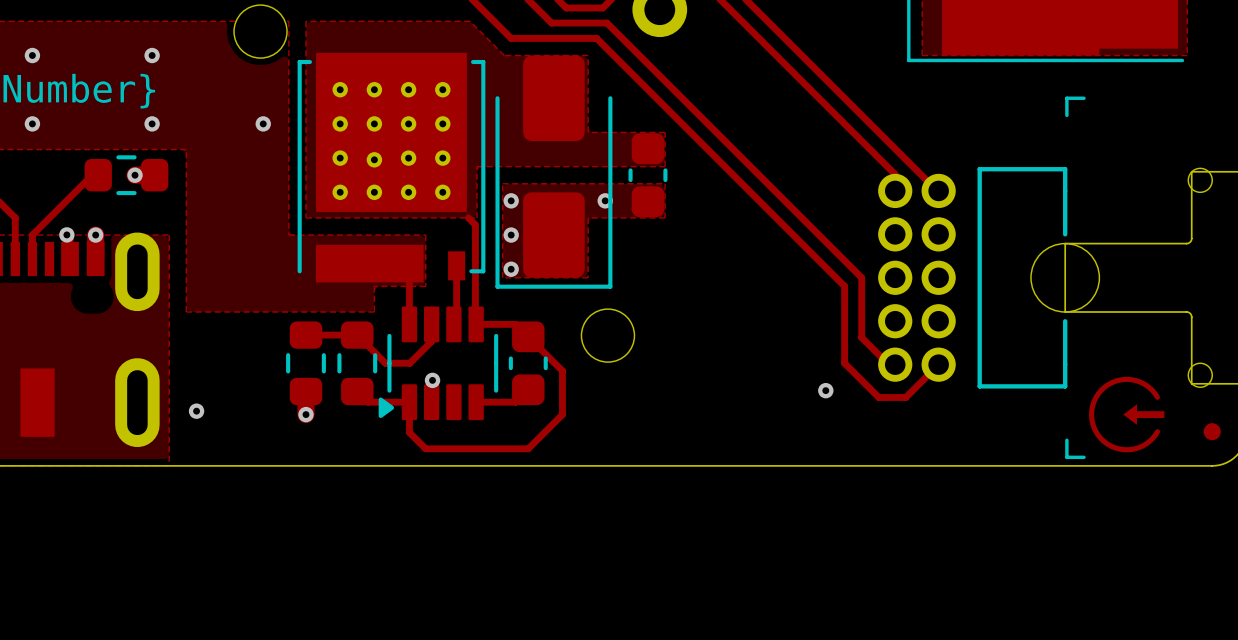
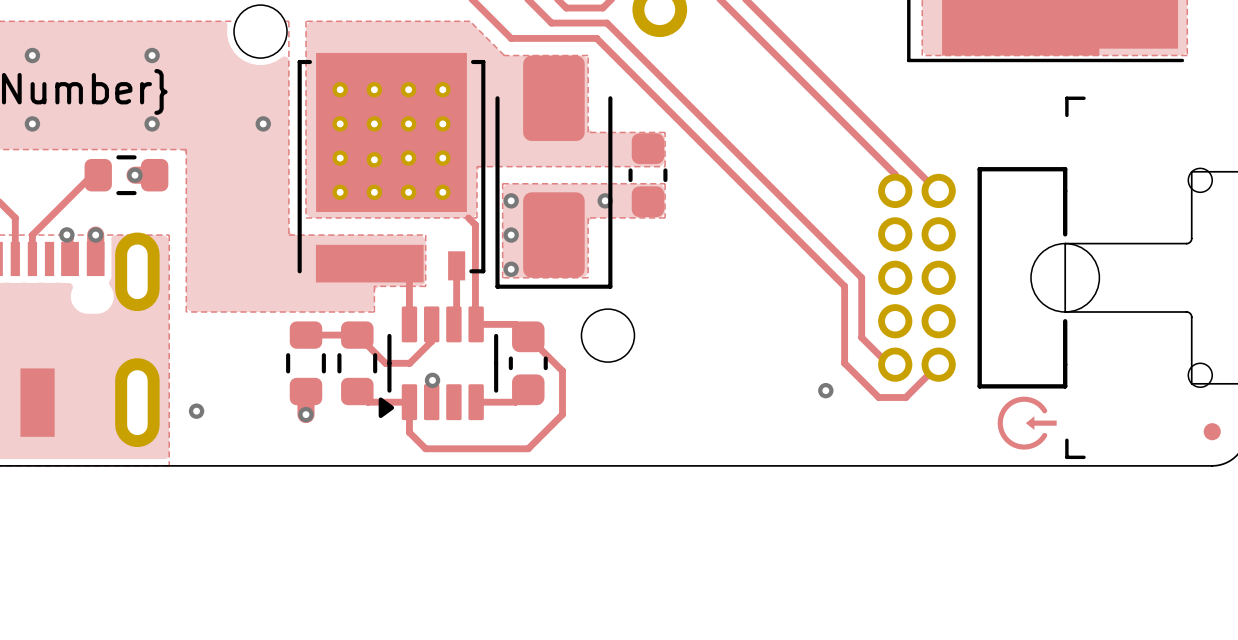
drawing: [1088, 376, 1165, 453] -> none
drawing: none -> [997, 396, 1057, 450]

